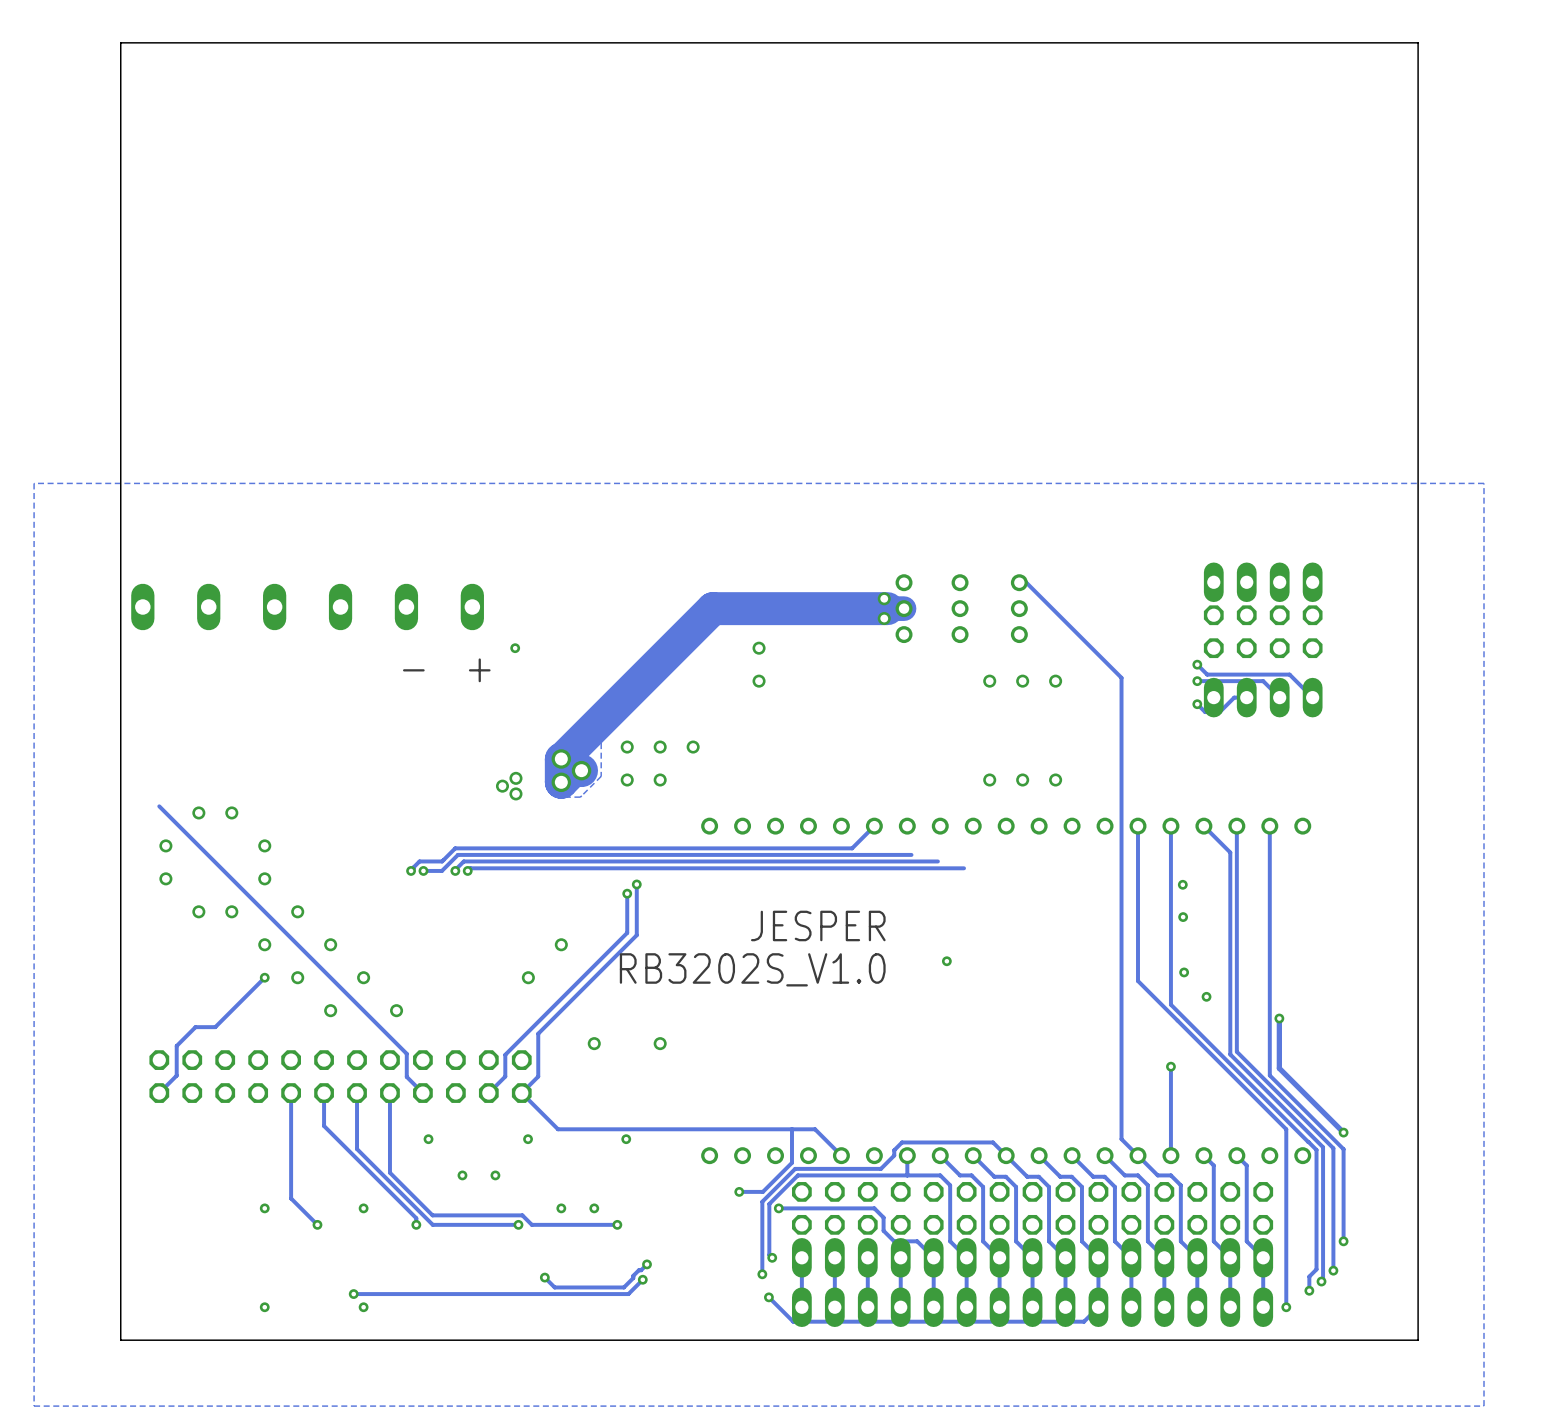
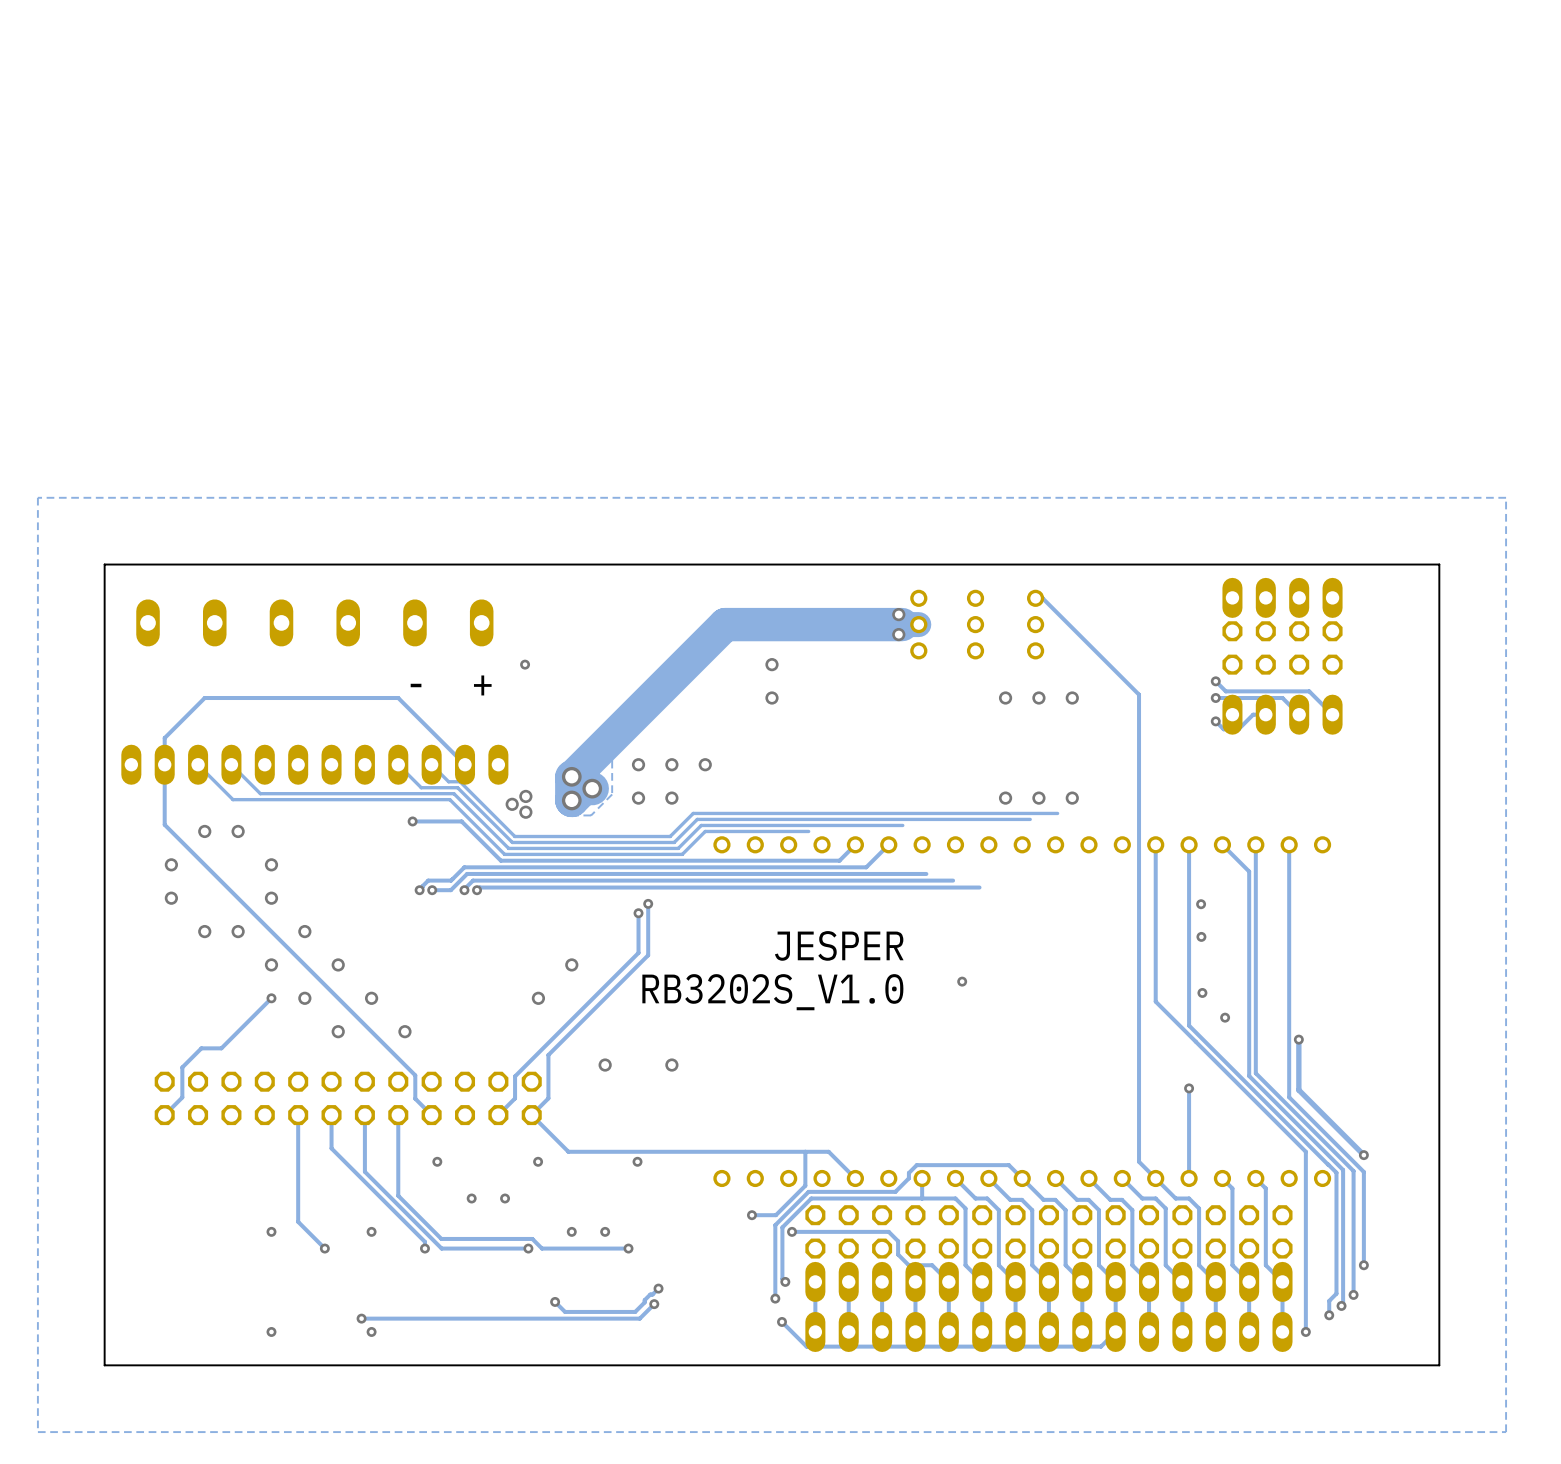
board edge: (1418, 549) (1418, 42) (120, 42) (120, 1340) -> (1439, 564) (104, 564) (104, 1365) (125, 1365)
track: none -> (198, 764) (232, 799) (449, 799) (504, 854) (682, 854) (705, 831) (808, 831)
part: none -> (214, 764)
track: none -> (231, 764) (260, 793) (453, 793) (508, 848) (678, 848) (701, 825) (902, 825)
track: none -> (398, 764) (421, 787) (457, 787) (512, 842) (674, 842) (697, 819) (1030, 819)
part: none -> (414, 764)
track: none -> (431, 764) (448, 781) (460, 781) (514, 836) (670, 836) (693, 813) (1057, 813)
track: none -> (465, 764) (398, 698) (204, 698) (164, 738) (164, 824)
track: none -> (412, 821) (461, 821) (500, 860) (839, 860) (855, 844)
via: none -> (412, 821)

